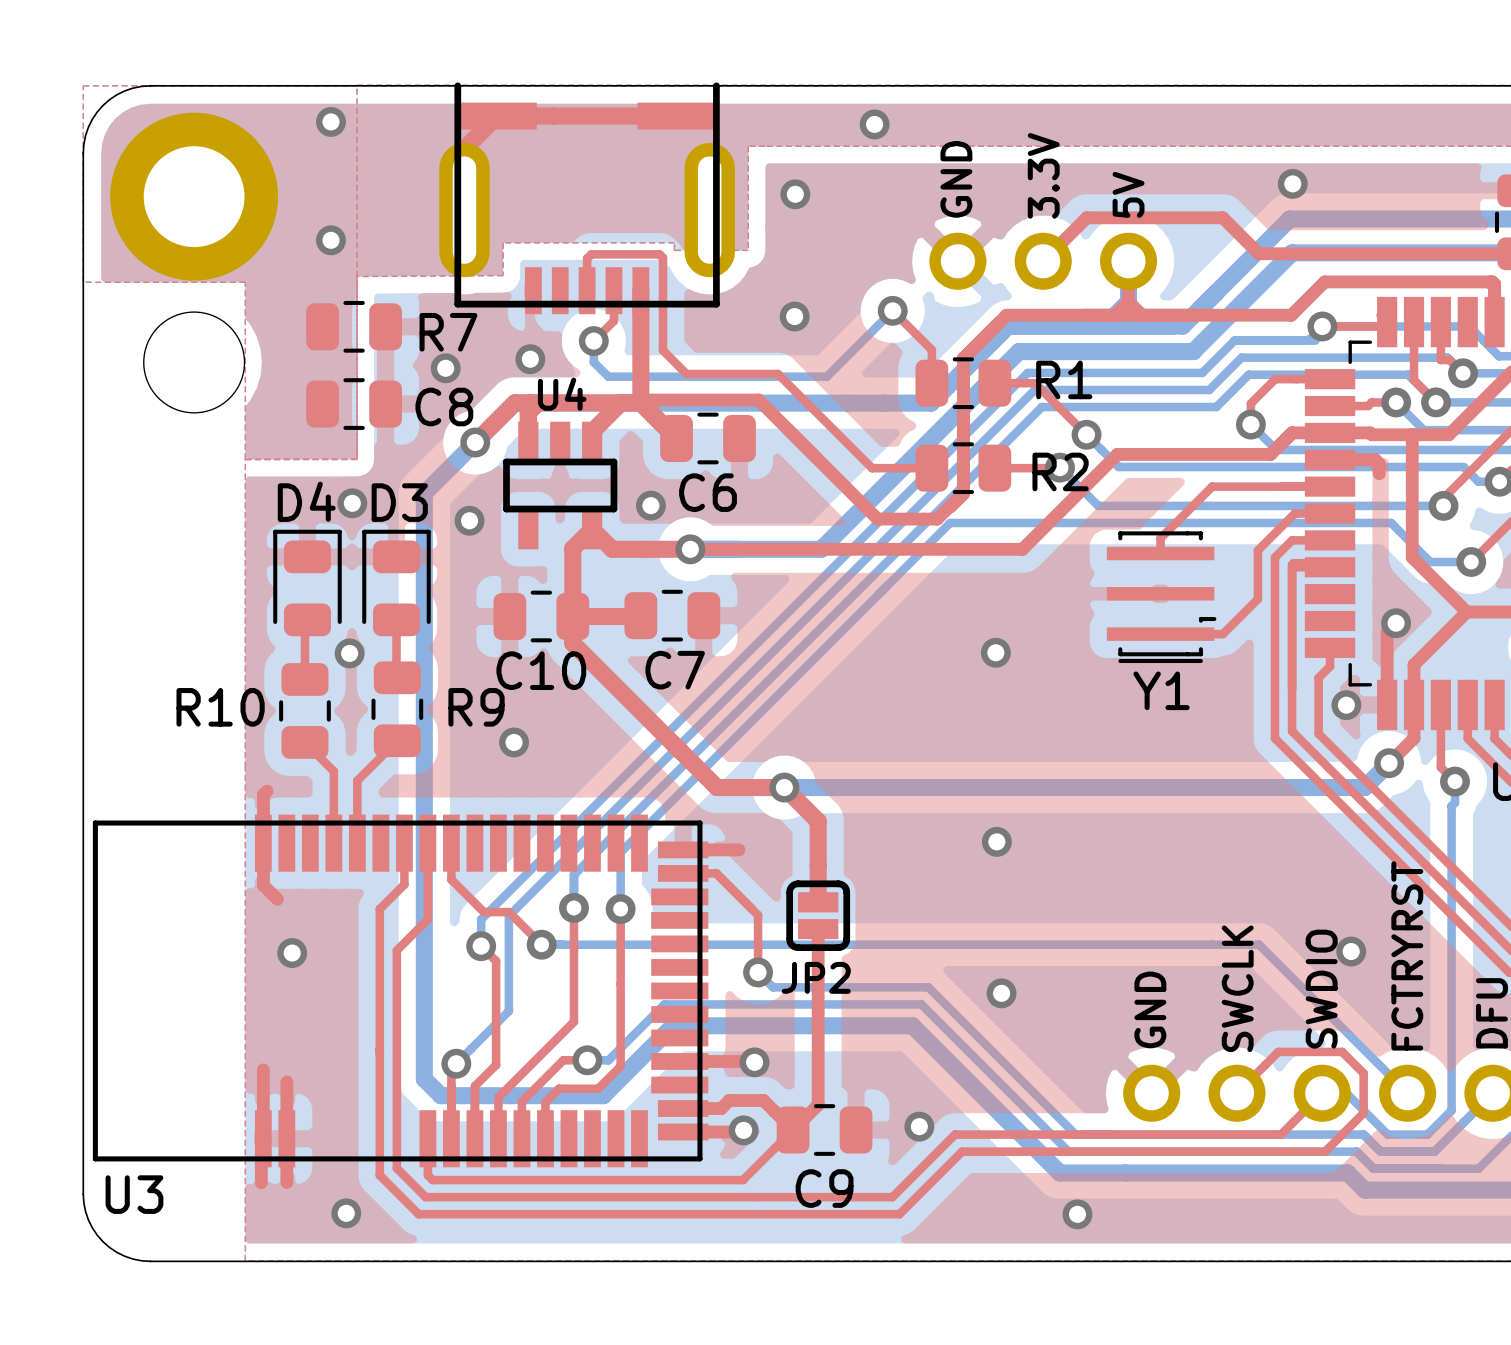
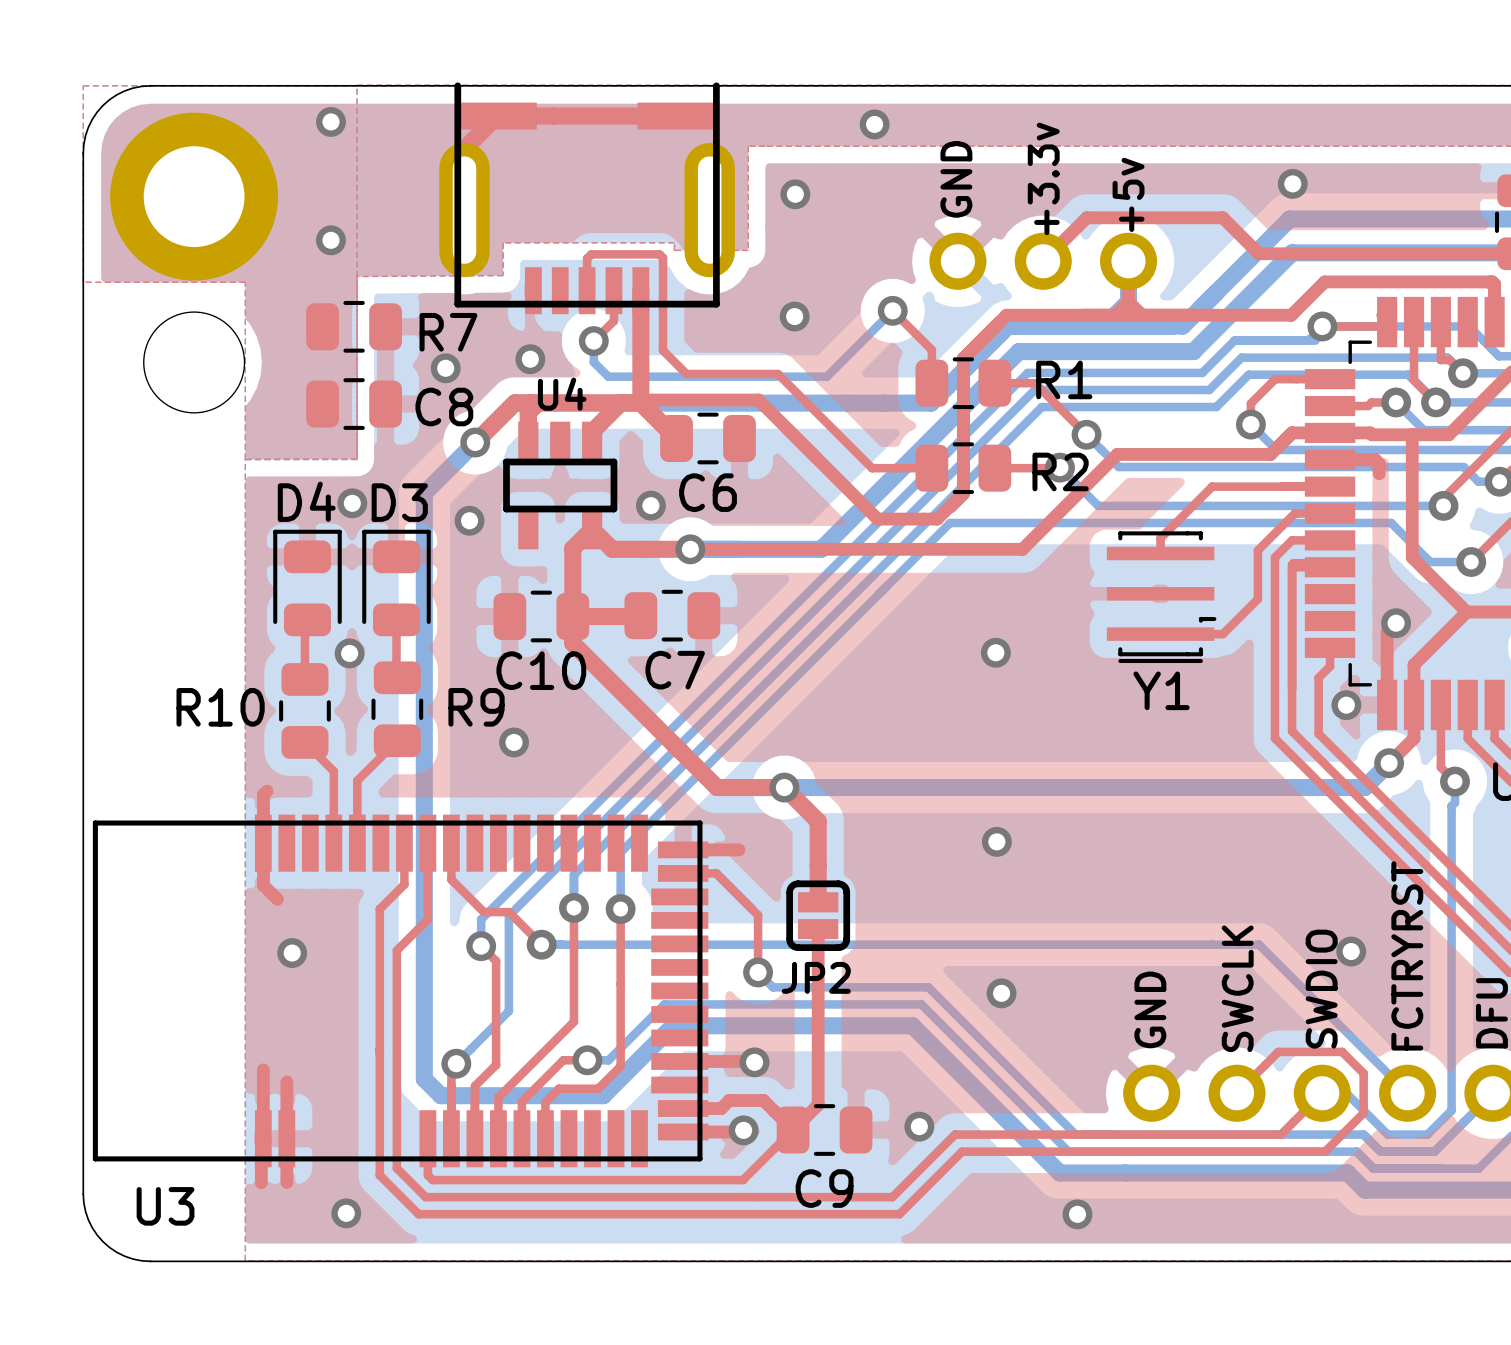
part value: 3.3V (1043, 175) -> +3.3v (1043, 178)
part value: 5V (1128, 194) -> +5v (1128, 194)
U3 name position: U3 (134, 1194) -> U3 (165, 1206)

